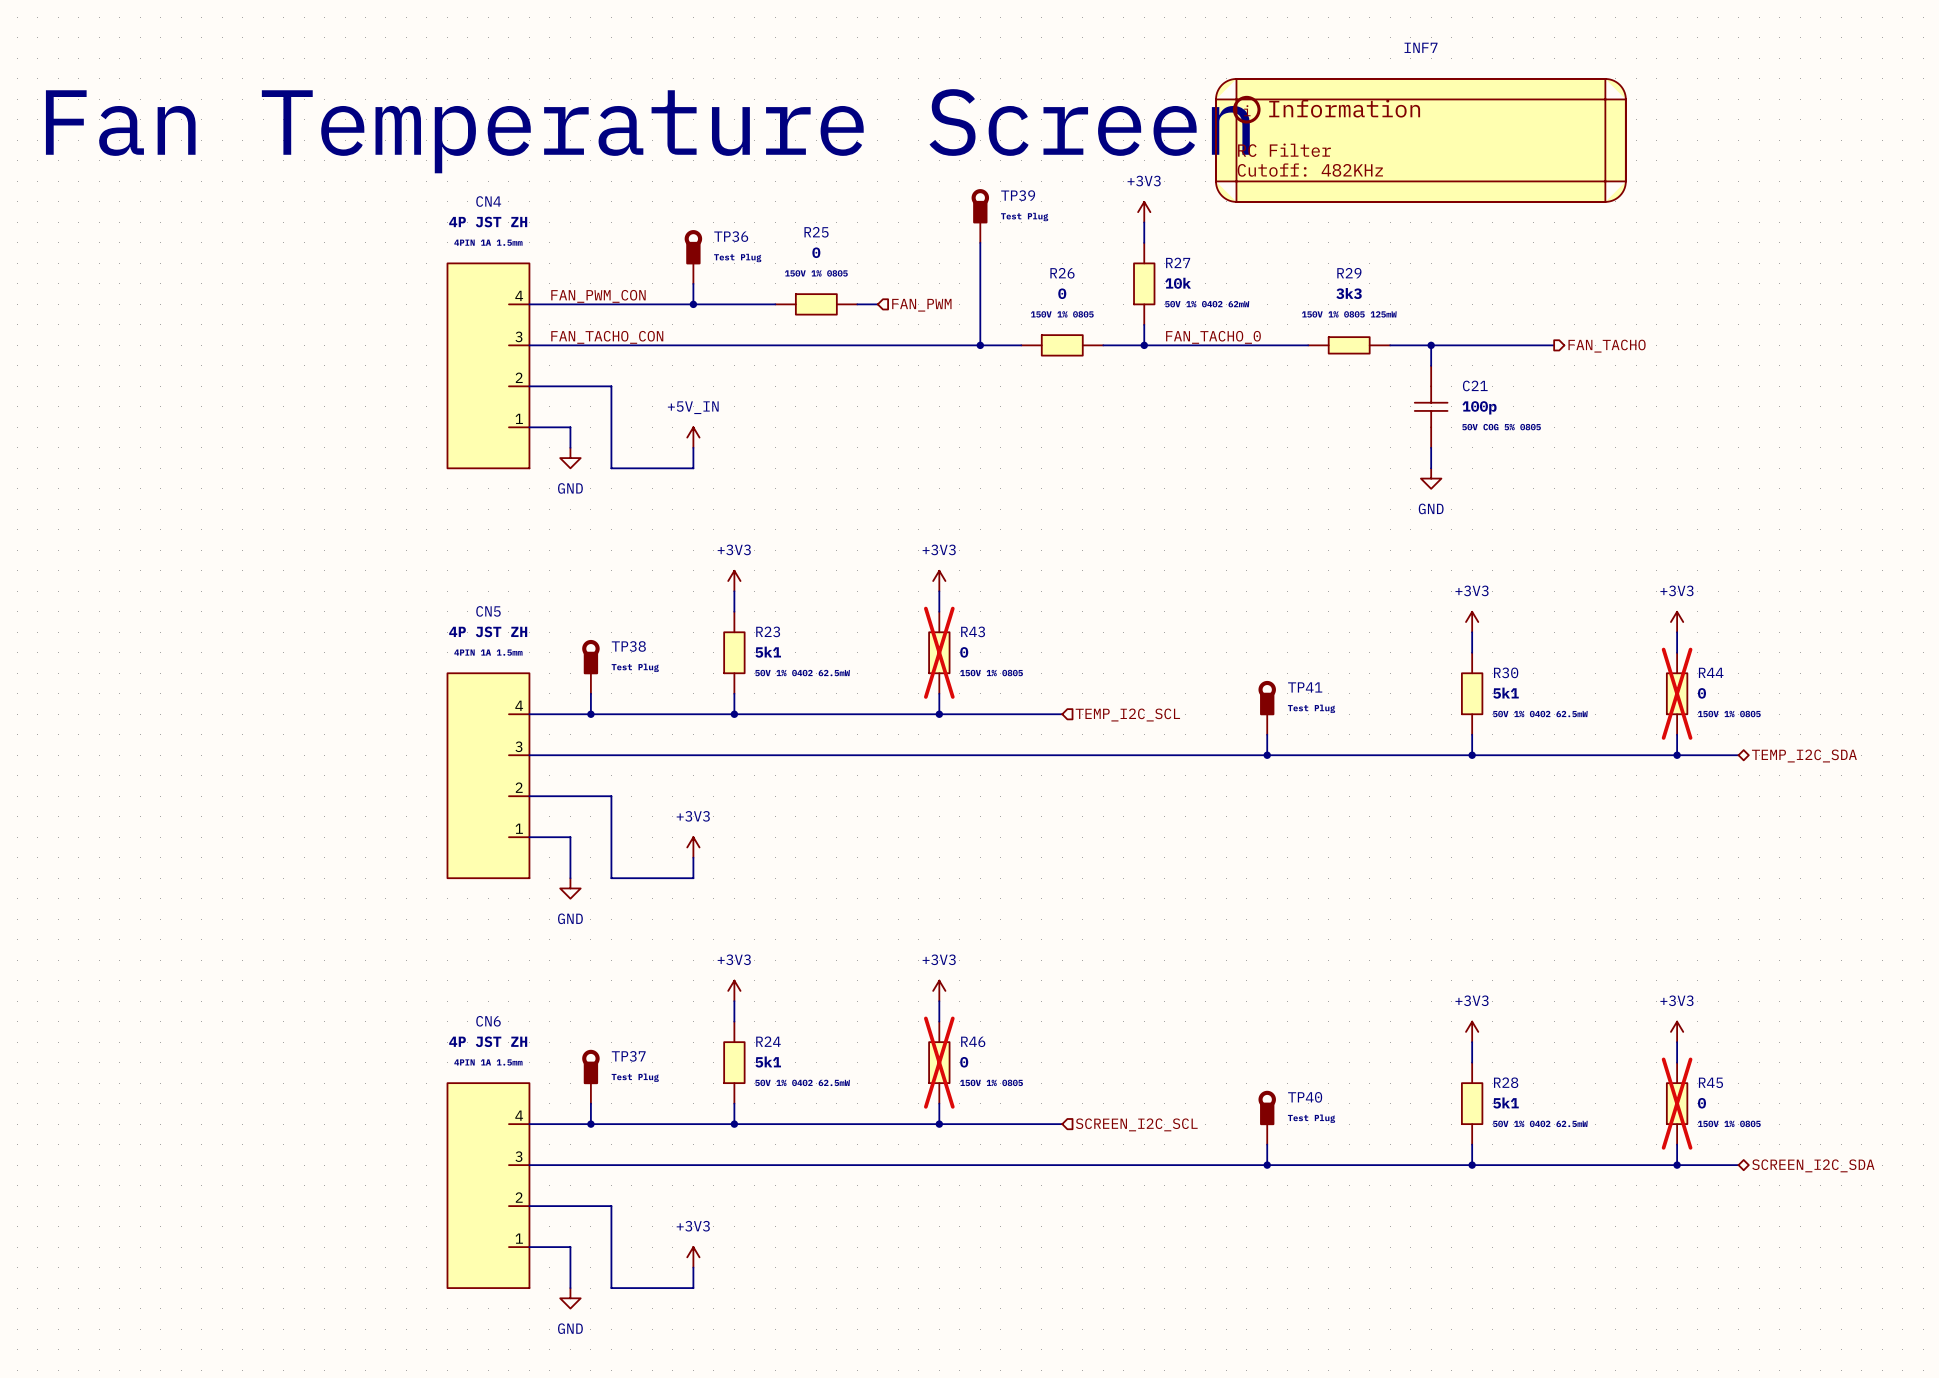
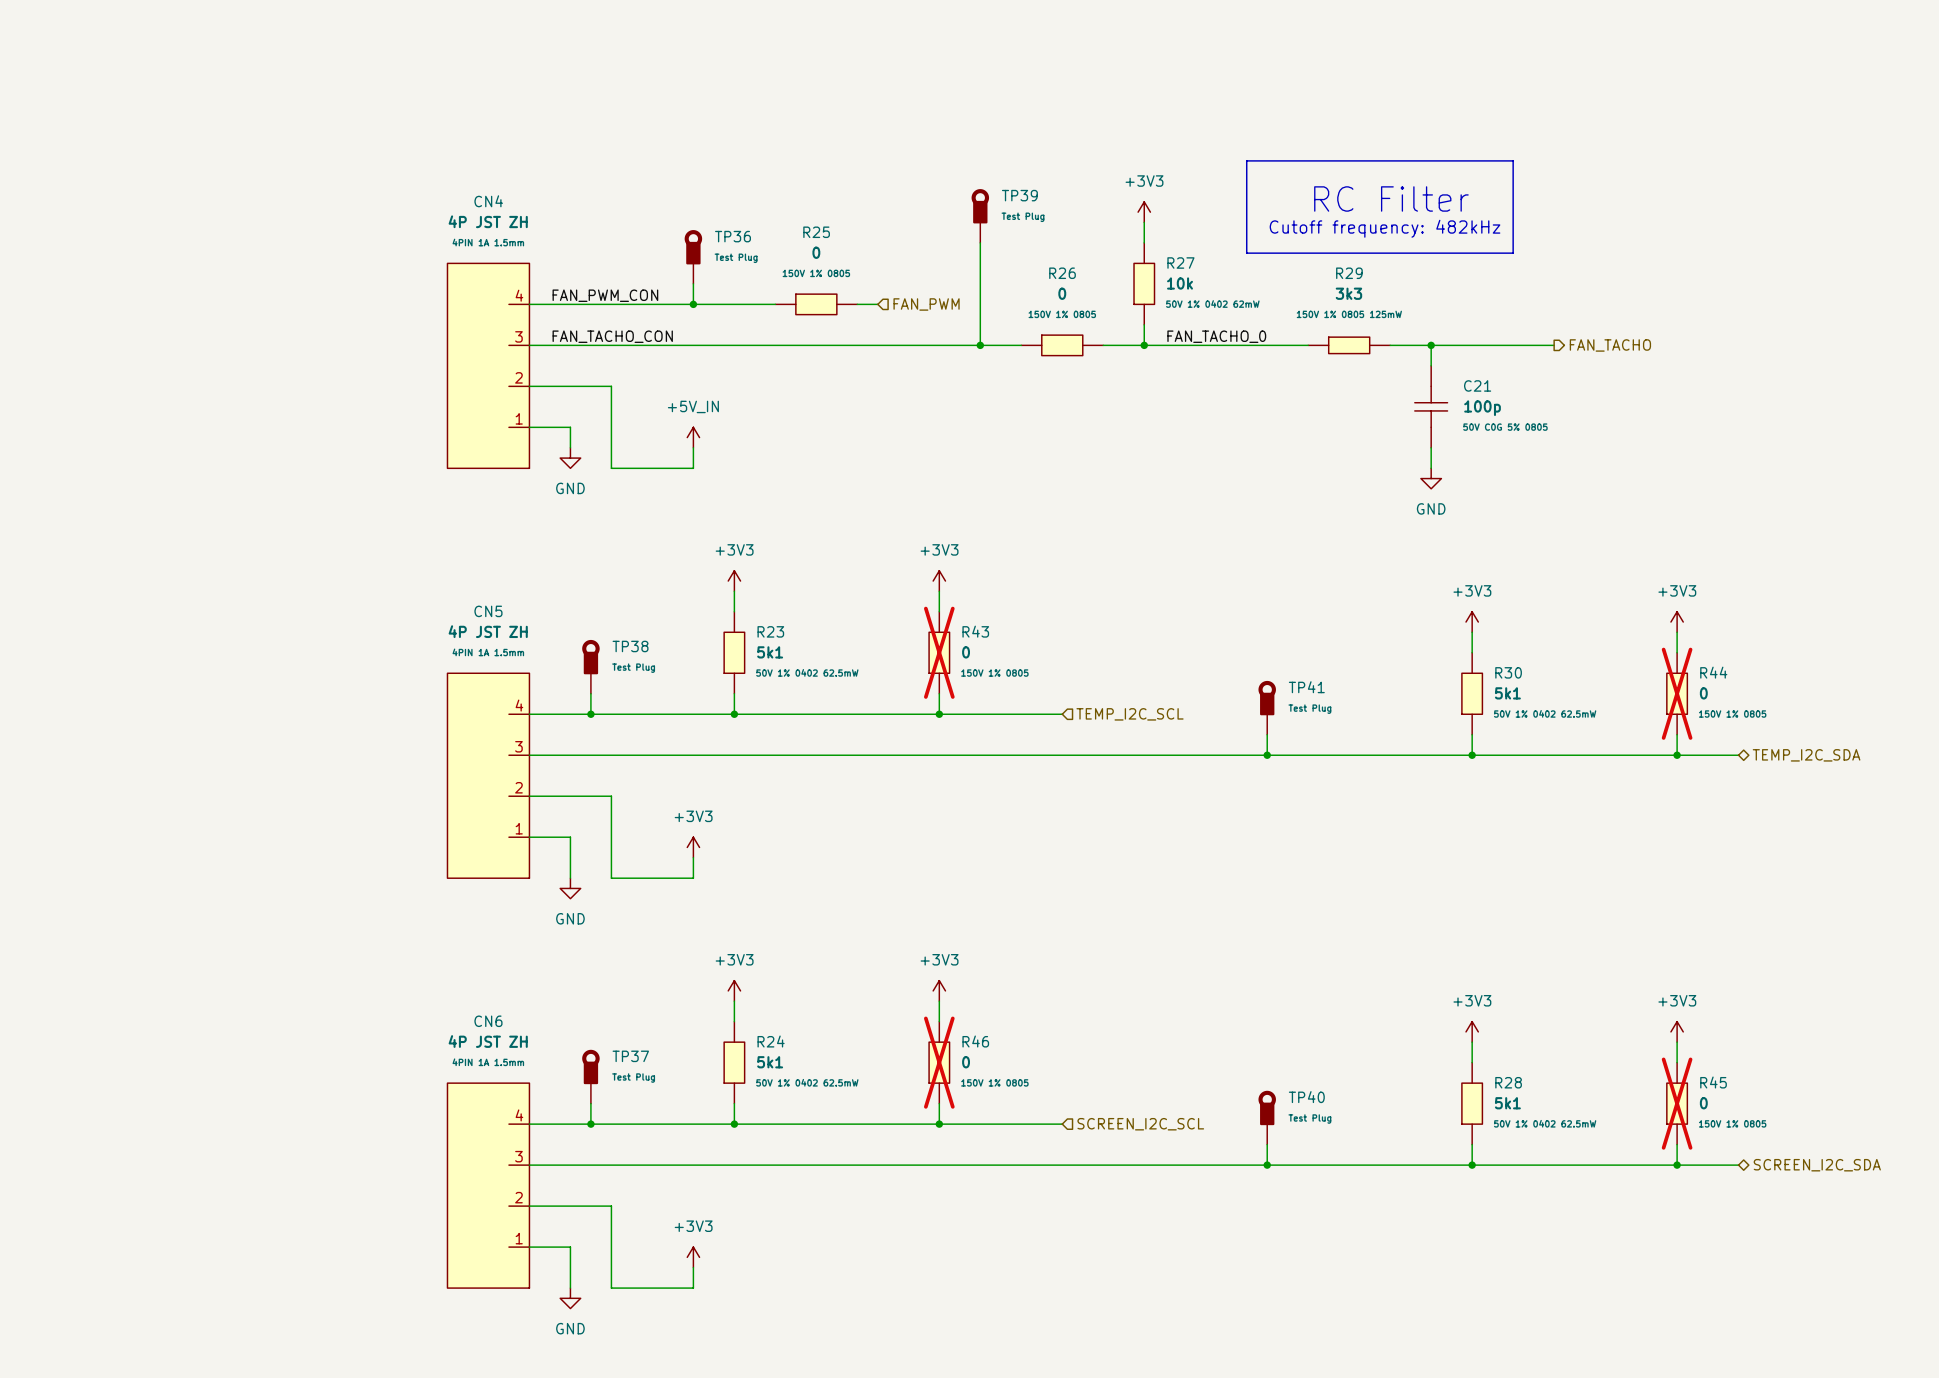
text: Fan Temperature Screen (647, 131) -> none
INF7: (1420, 140) -> none
line: none -> (1246, 160) (1513, 160) (1513, 253) (1246, 253) (1246, 160)
text: none -> RC Filter (1391, 198)
text: none -> Cutoff frequency: 482kHz (1385, 228)

